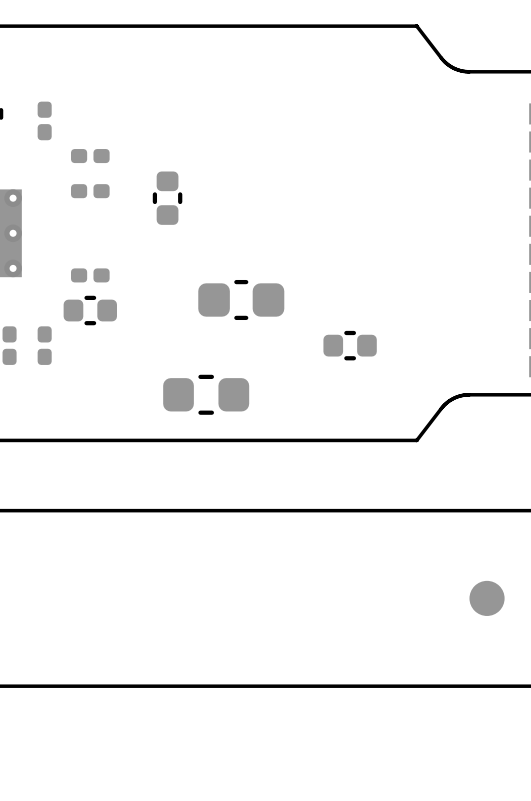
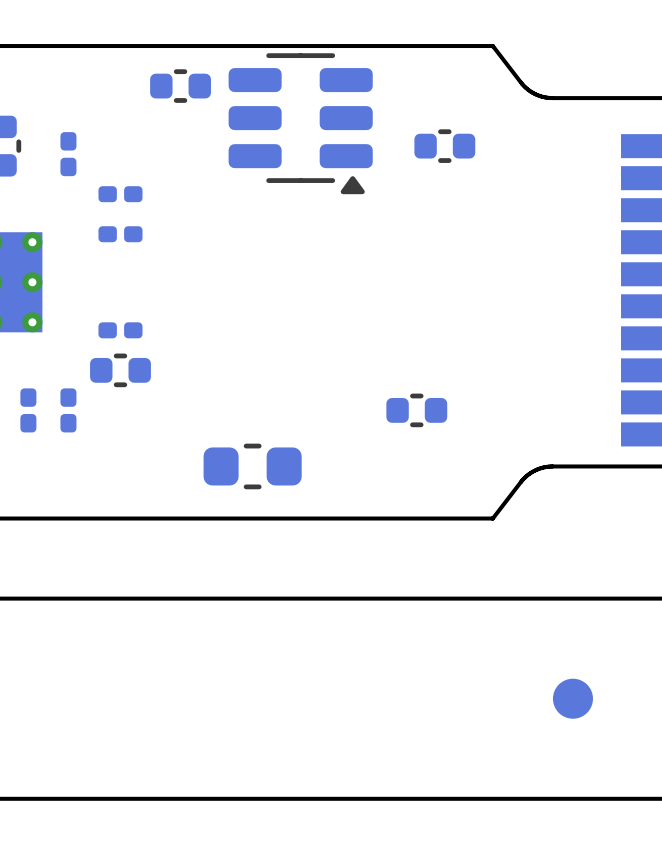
part: none -> (180, 86)
part: none -> (300, 123)
part: none -> (444, 146)
part: (167, 198) -> none
part: (241, 299) -> none

